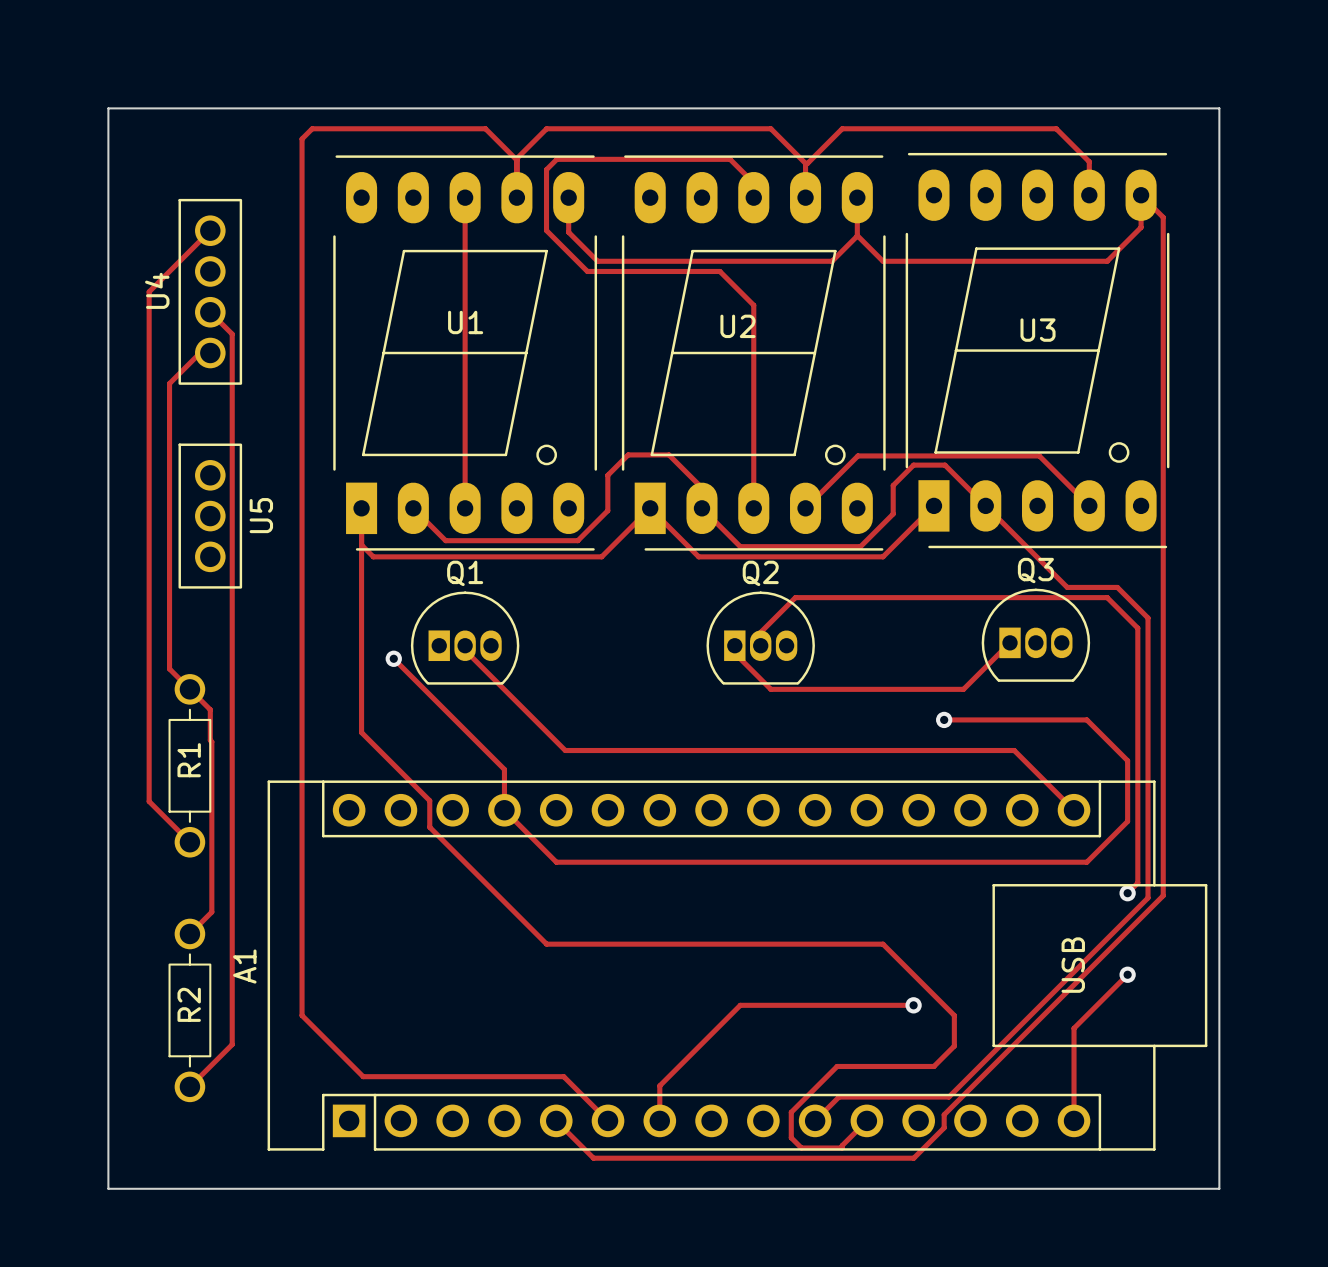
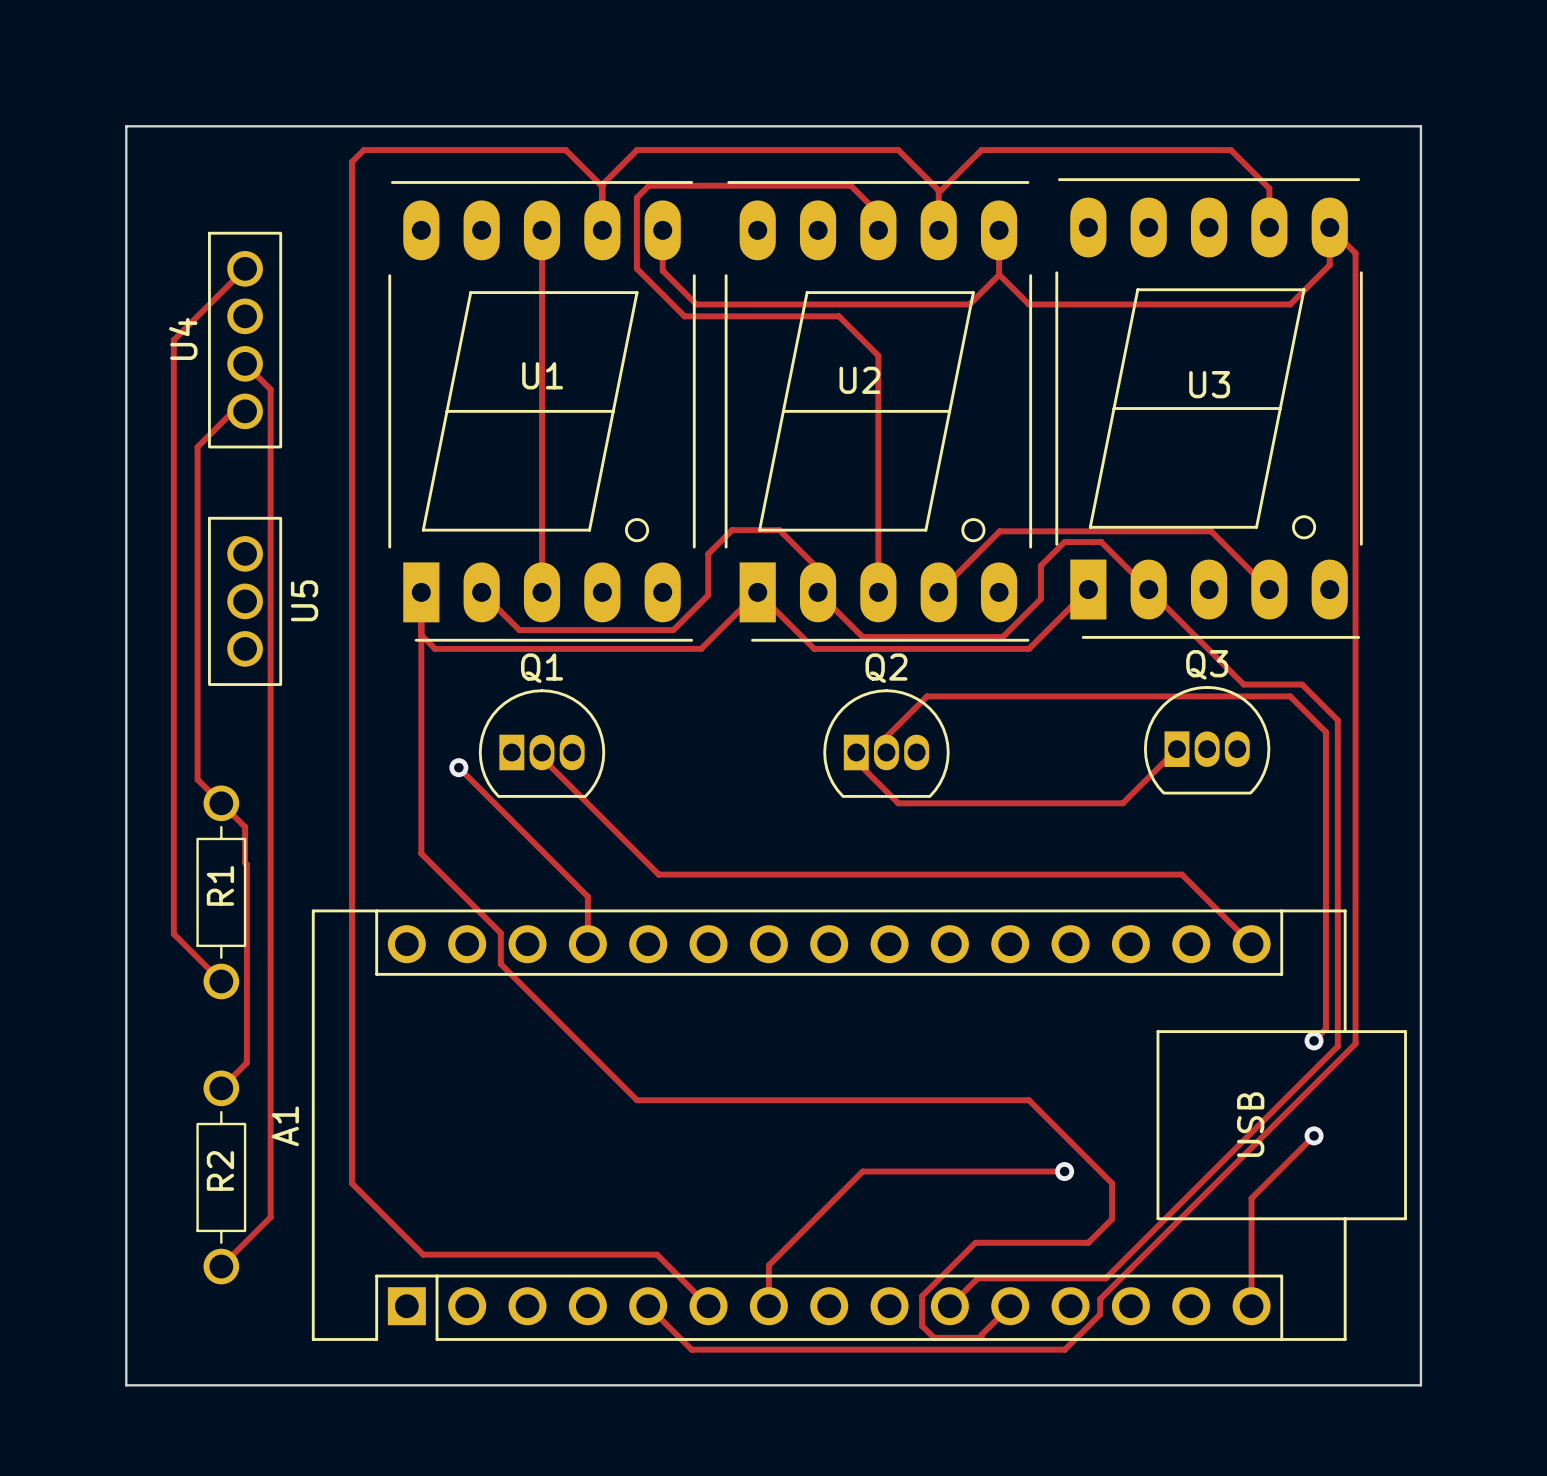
track: (944, 719) (1086, 719) (1127, 760) (1127, 821) (1086, 862) (556, 862) (504, 810) -> none
via: (944, 719) -> none

